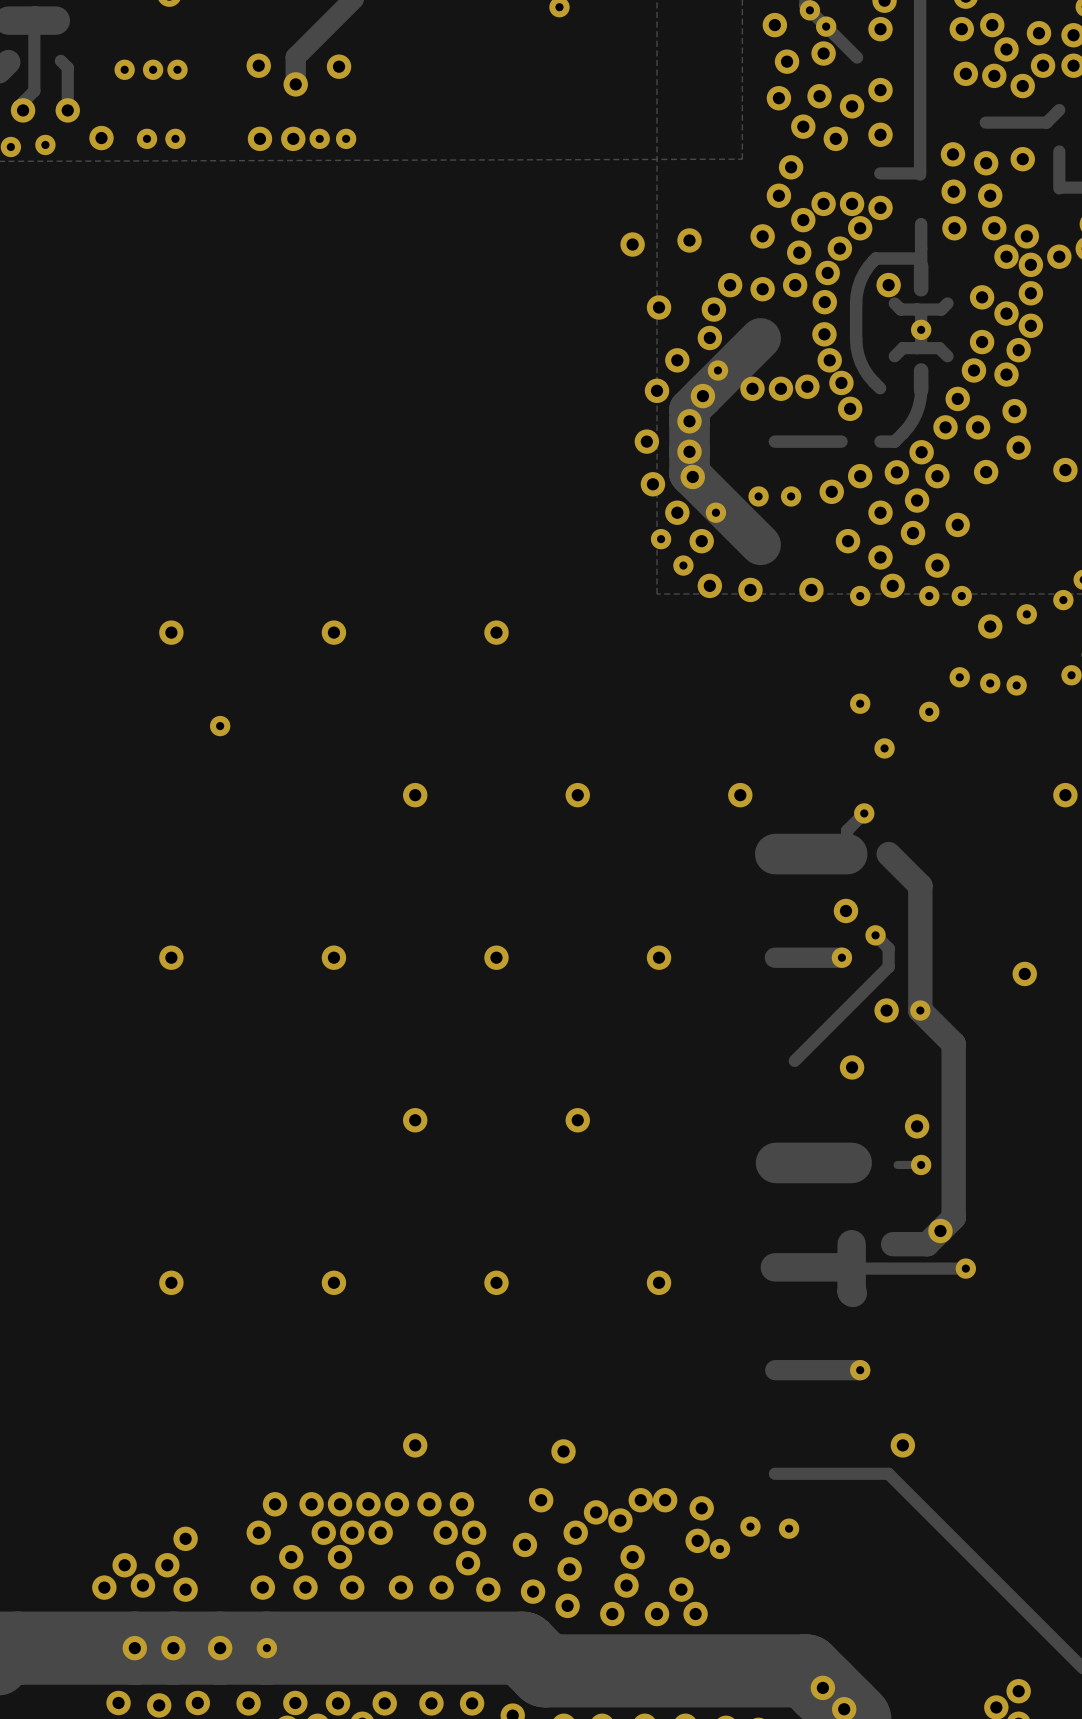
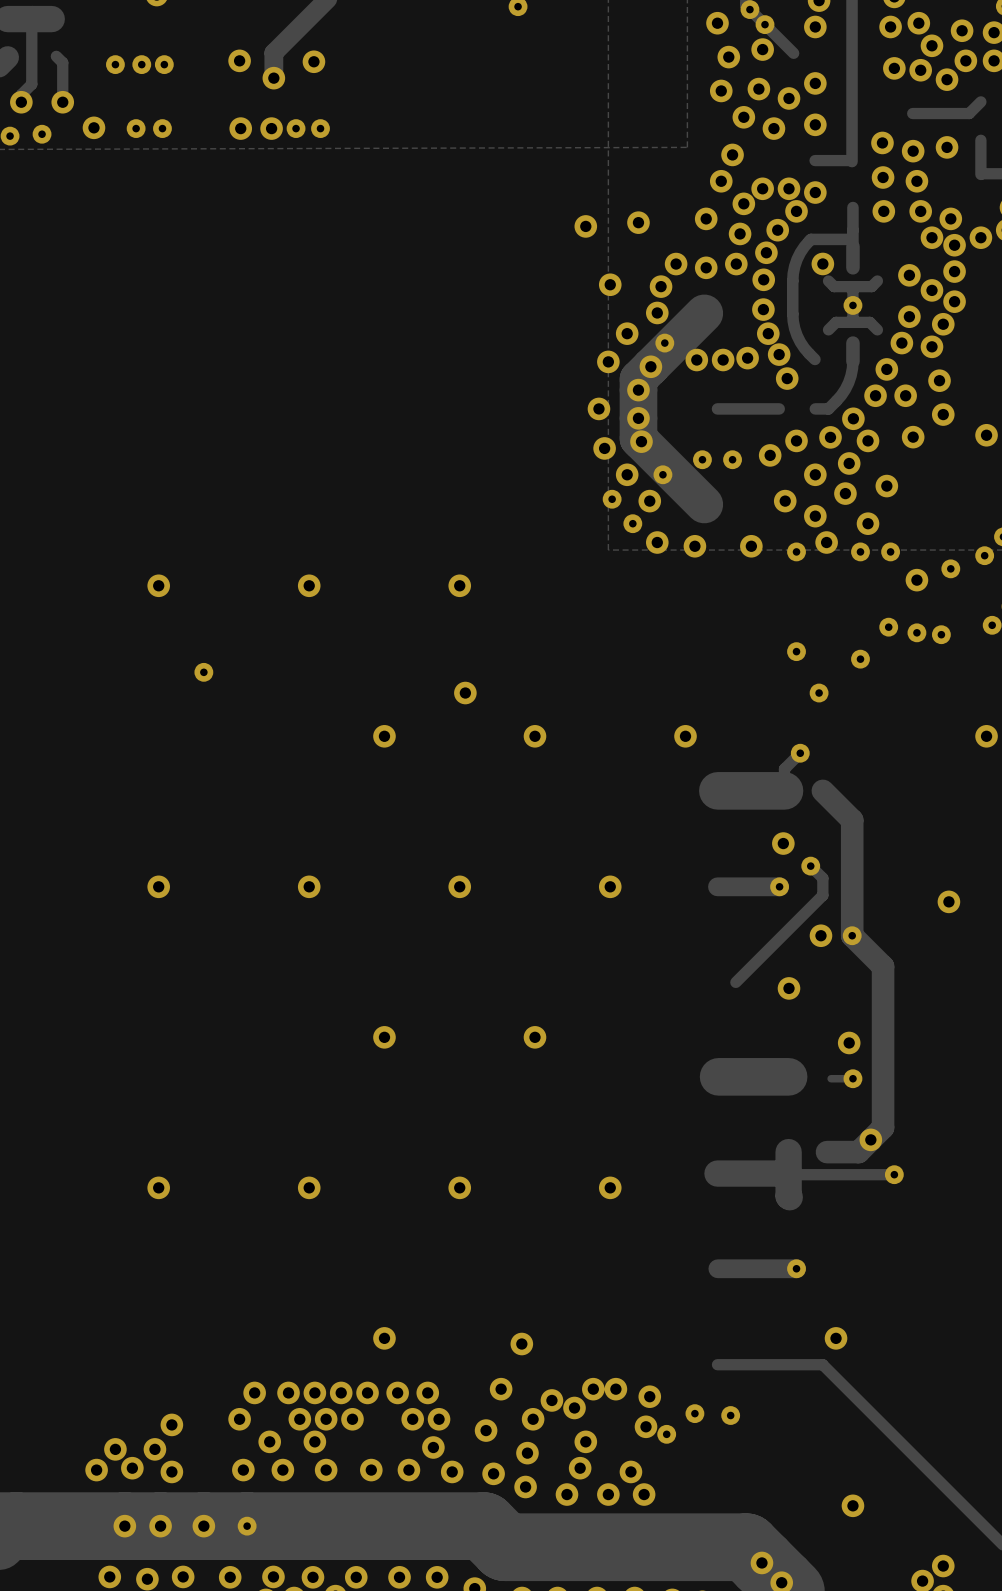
via: none -> (465, 693)
via: none -> (852, 1505)

